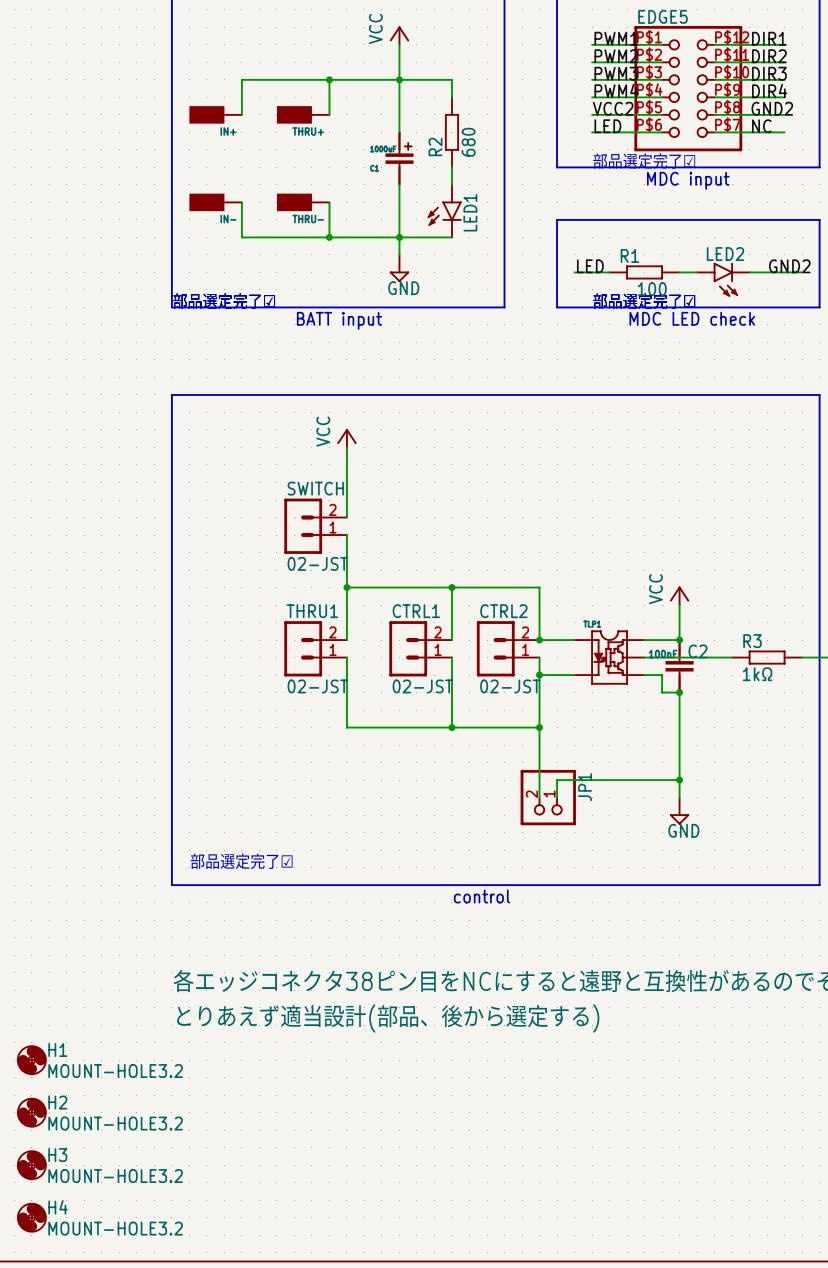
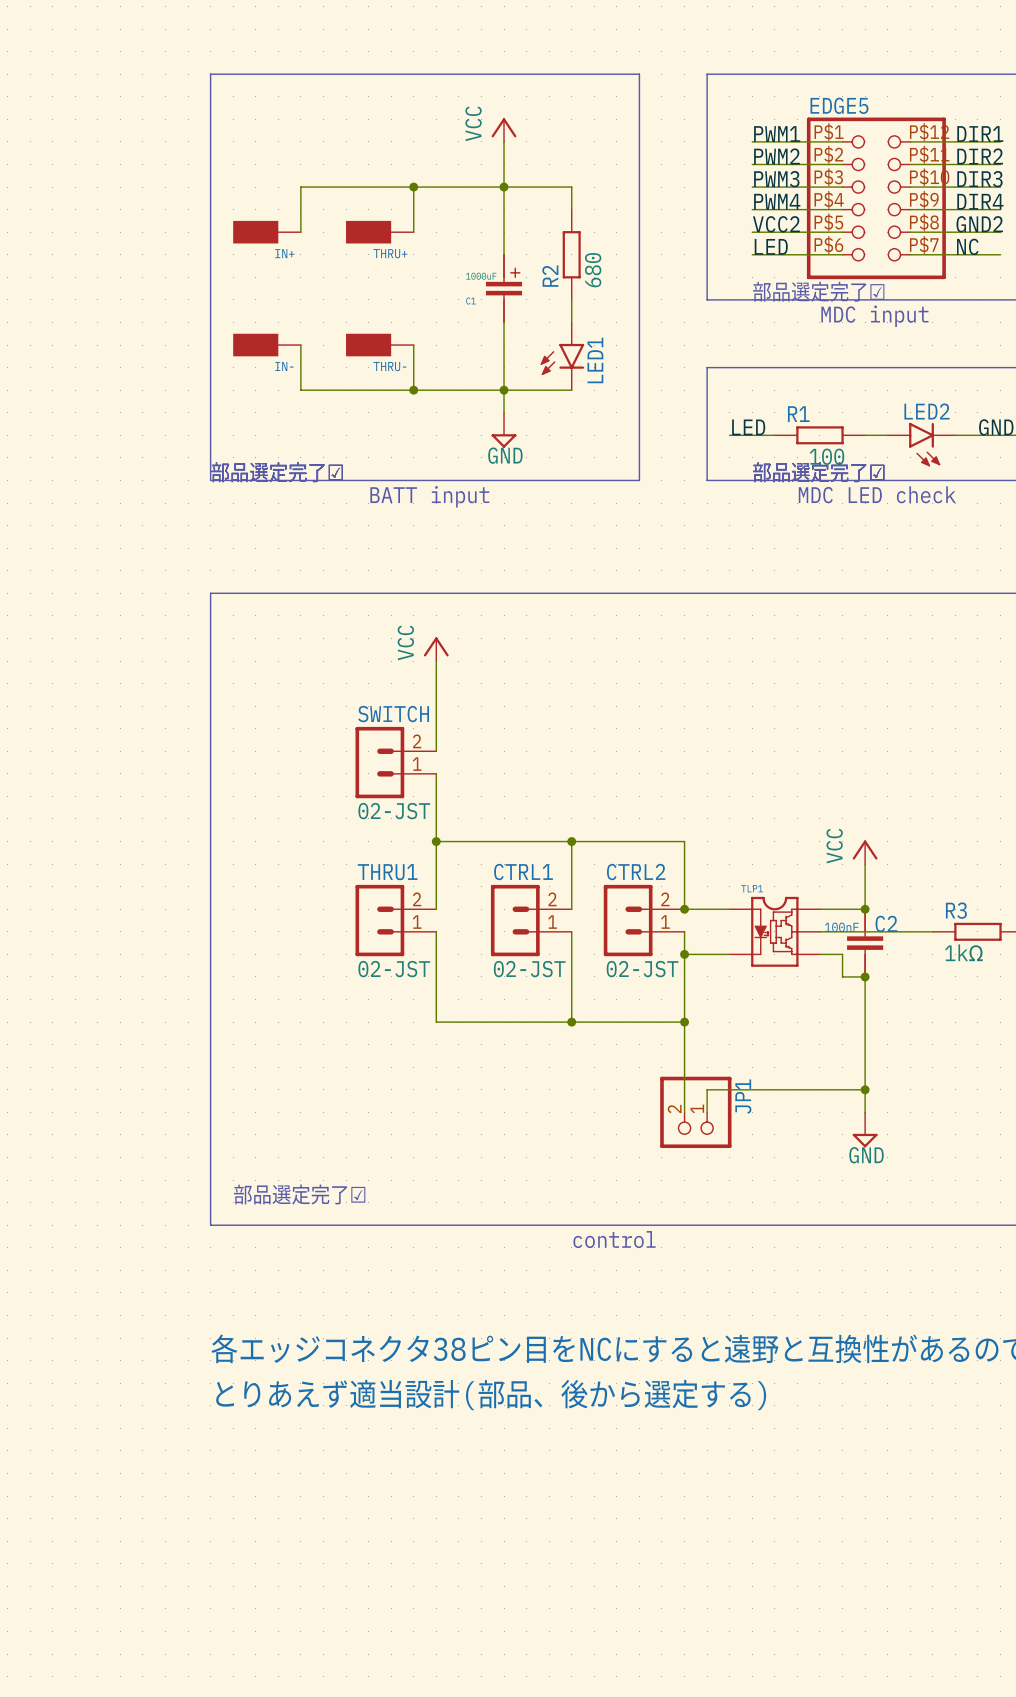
H1: MOUNT-HOLE3.2 (31, 1060) -> none
H2: MOUNT-HOLE3.2 (31, 1112) -> none
H3: MOUNT-HOLE3.2 (31, 1165) -> none
H4: MOUNT-HOLE3.2 (31, 1217) -> none

